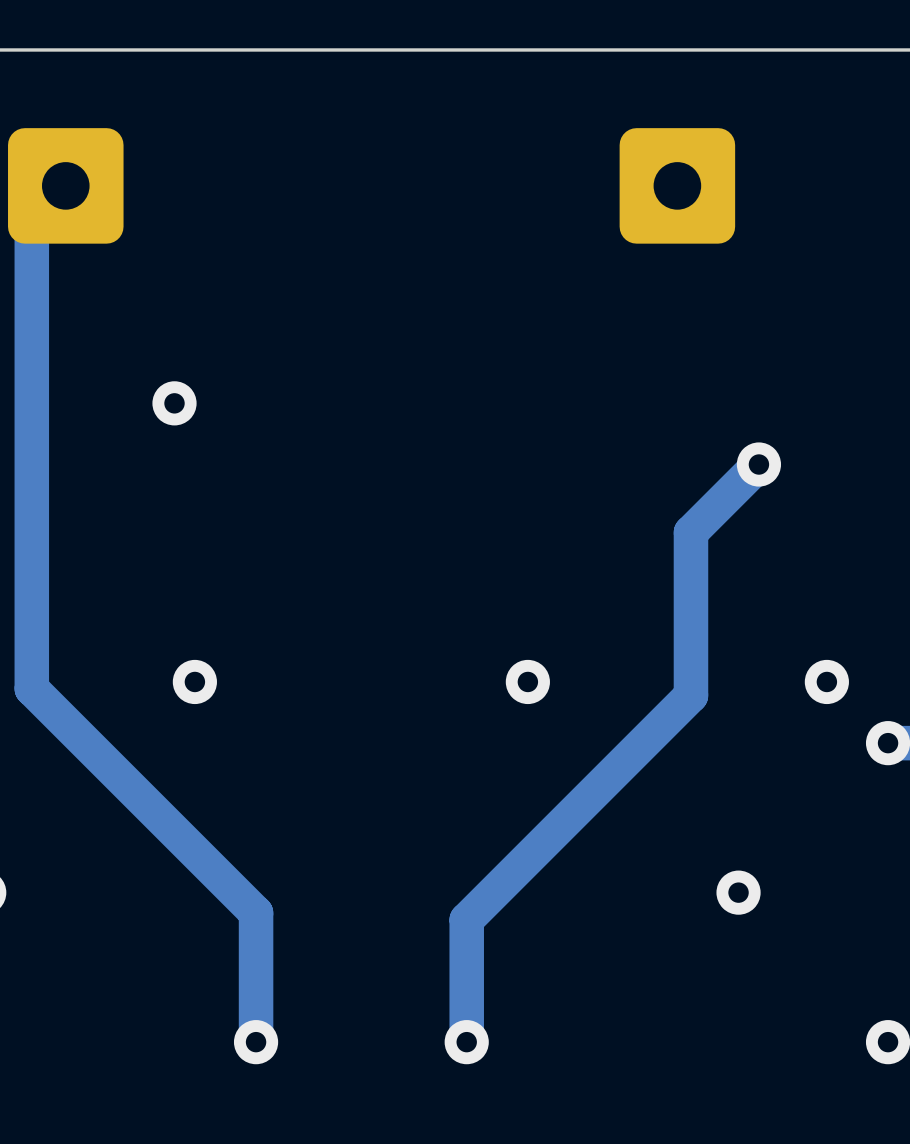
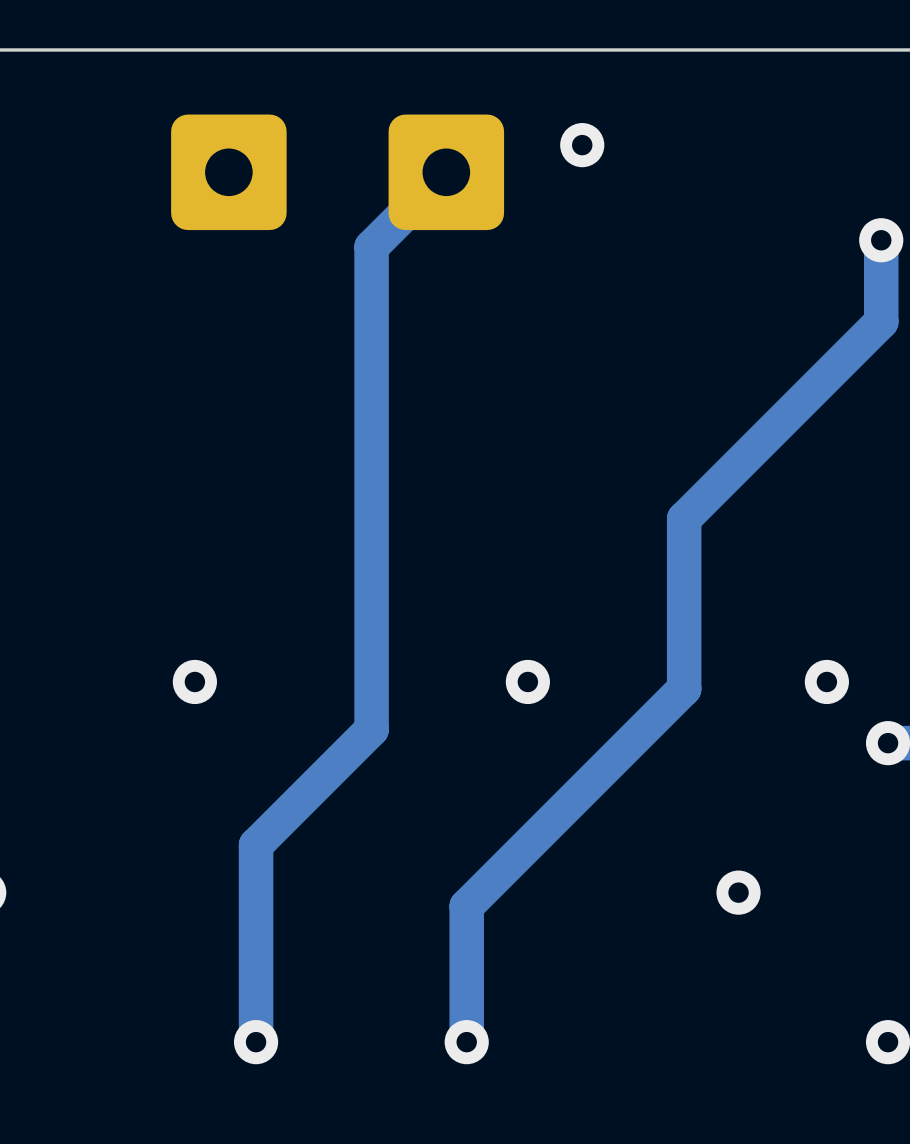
via: none -> (582, 145)
part: none -> (228, 172)
part: none -> (446, 172)
track: (65, 185) (31, 219) (31, 688) (256, 913) -> (446, 172) (371, 247) (371, 729) (256, 845) (256, 913)
part: (65, 185) -> none
part: (677, 185) -> none
via: none -> (881, 240)
via: (174, 403) -> none
track: (758, 464) (690, 532) (690, 695) (466, 919) -> (881, 240) (881, 321) (684, 518) (684, 688) (466, 906) (466, 919)
via: (758, 464) -> none

